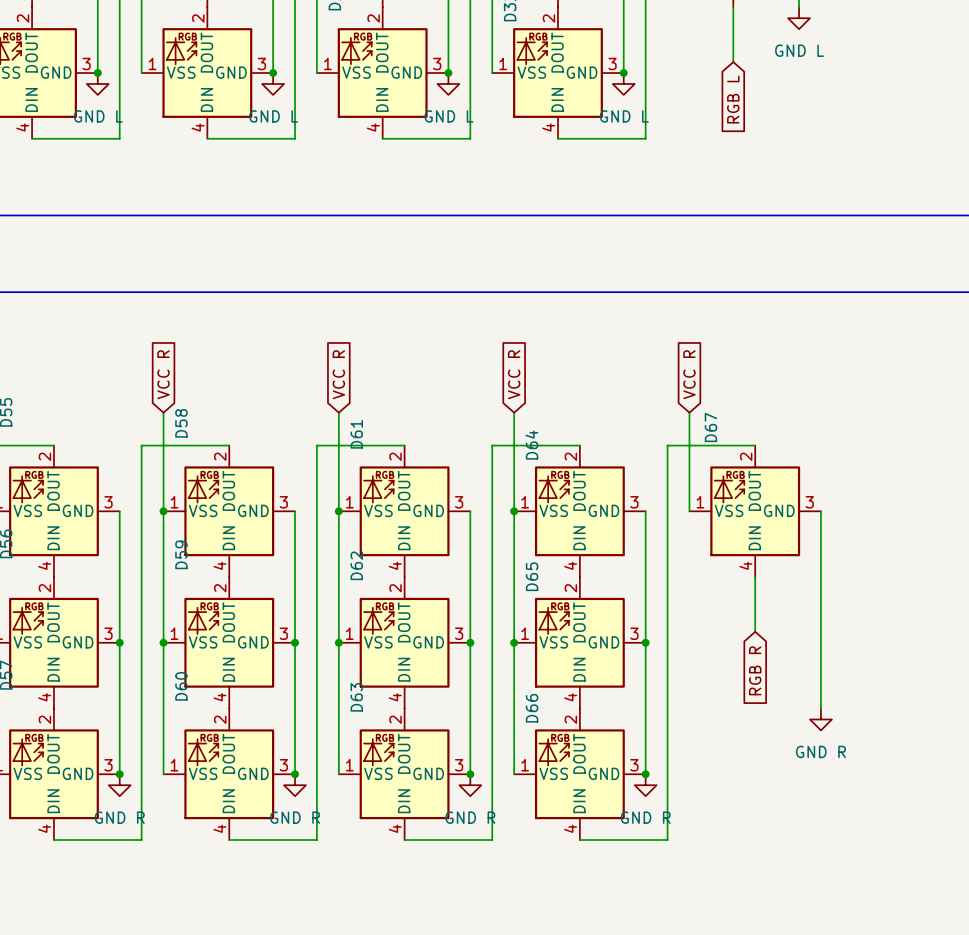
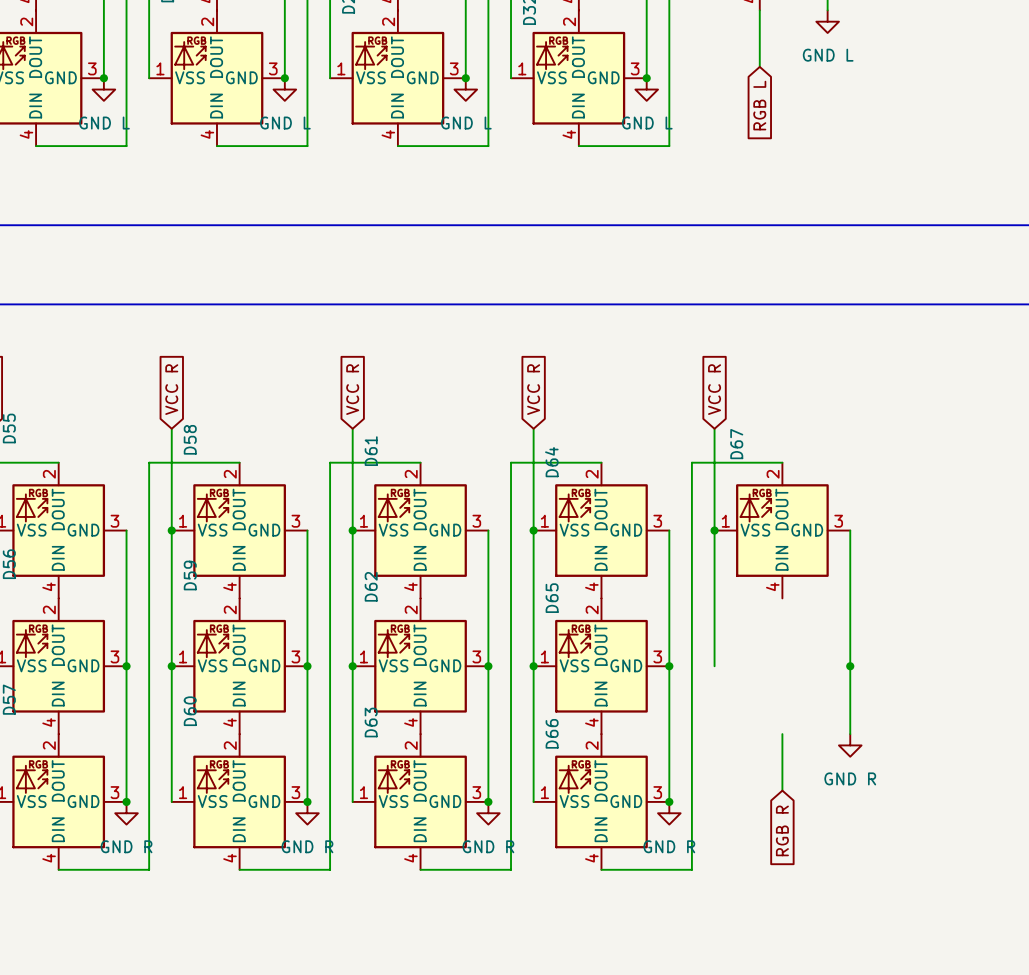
wire: none -> (714, 530) (714, 666)
junction: none -> (714, 530)
wire: (755, 577) (755, 631) -> (782, 734) (782, 790)
junction: none -> (850, 666)
global label position: RGB R (755, 670) -> RGB R (782, 830)

